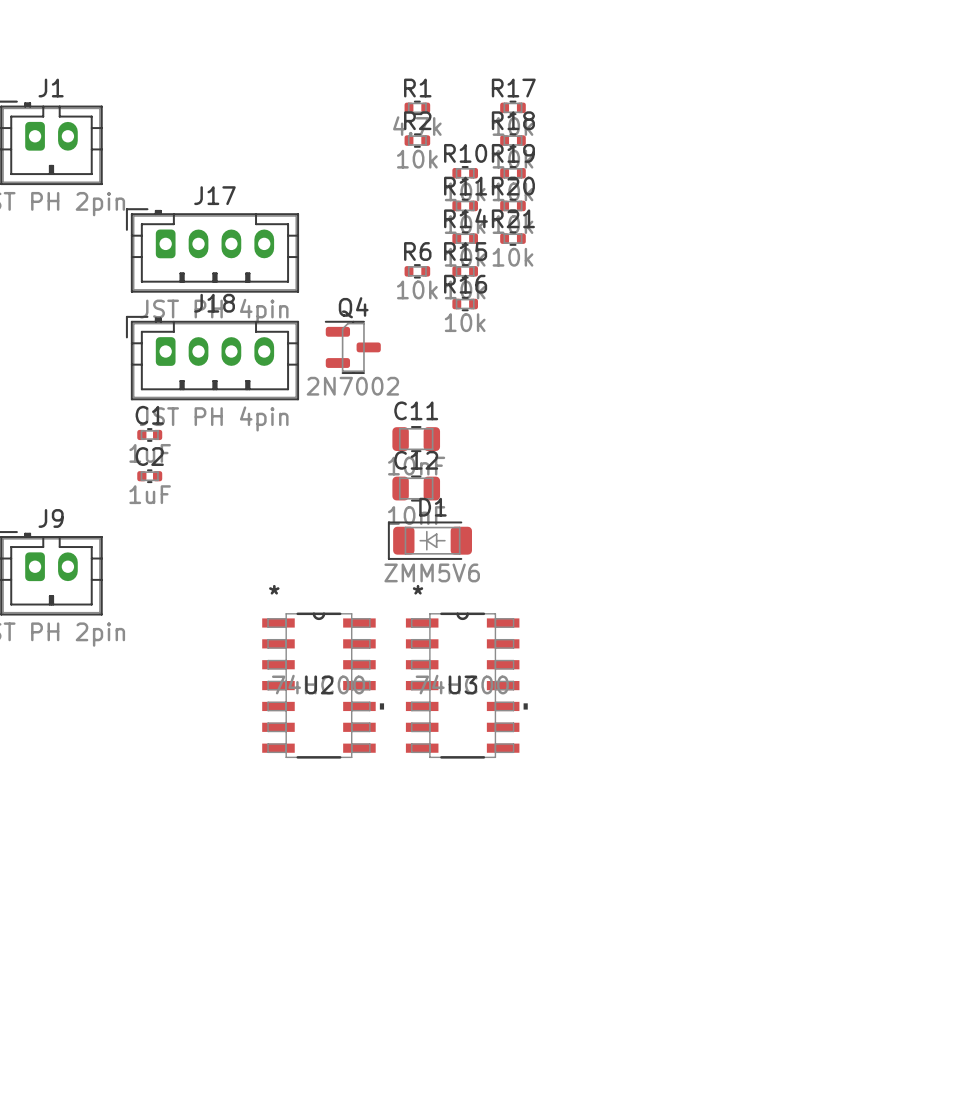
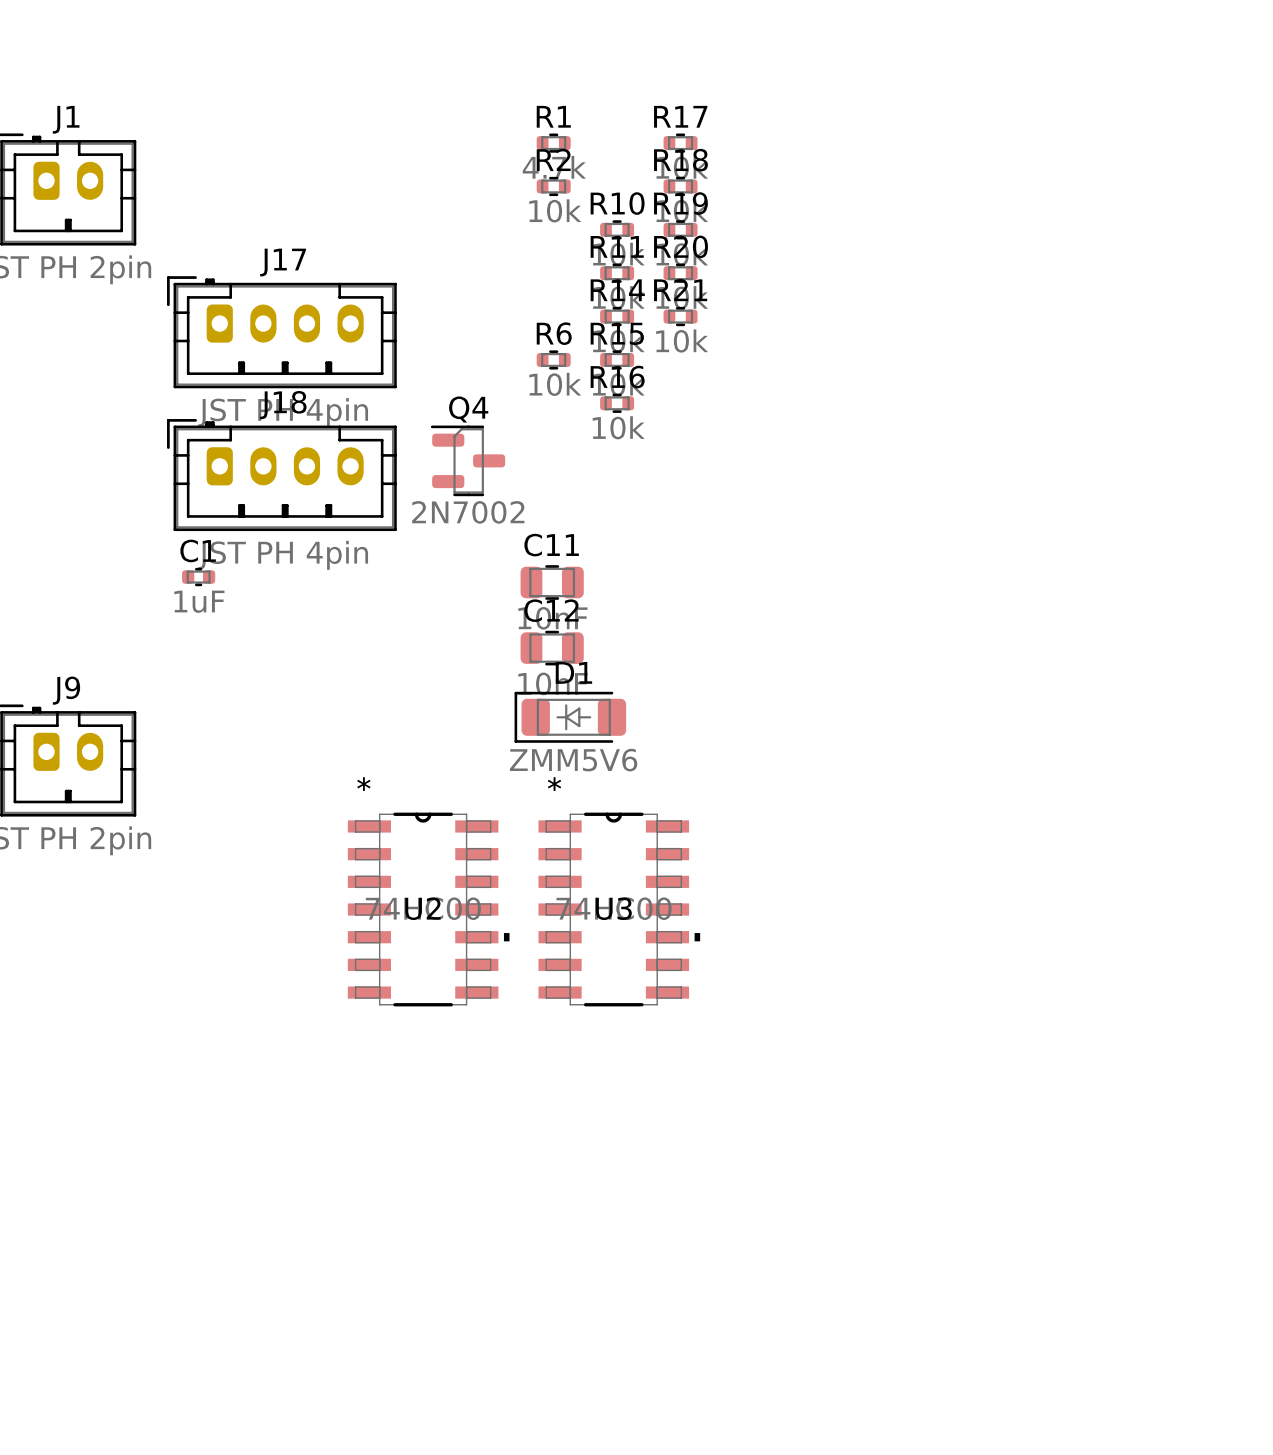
C2: 1uF (149, 476) -> none

